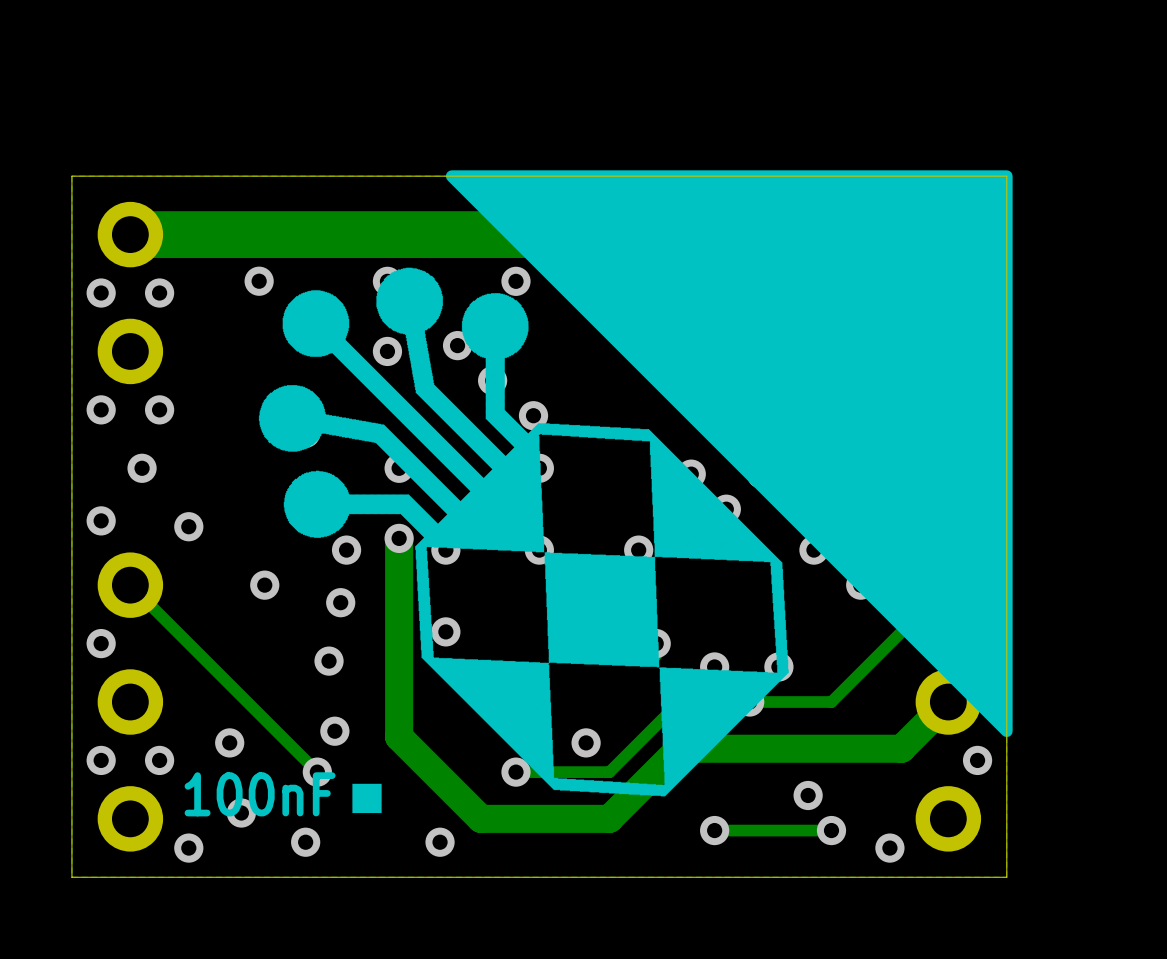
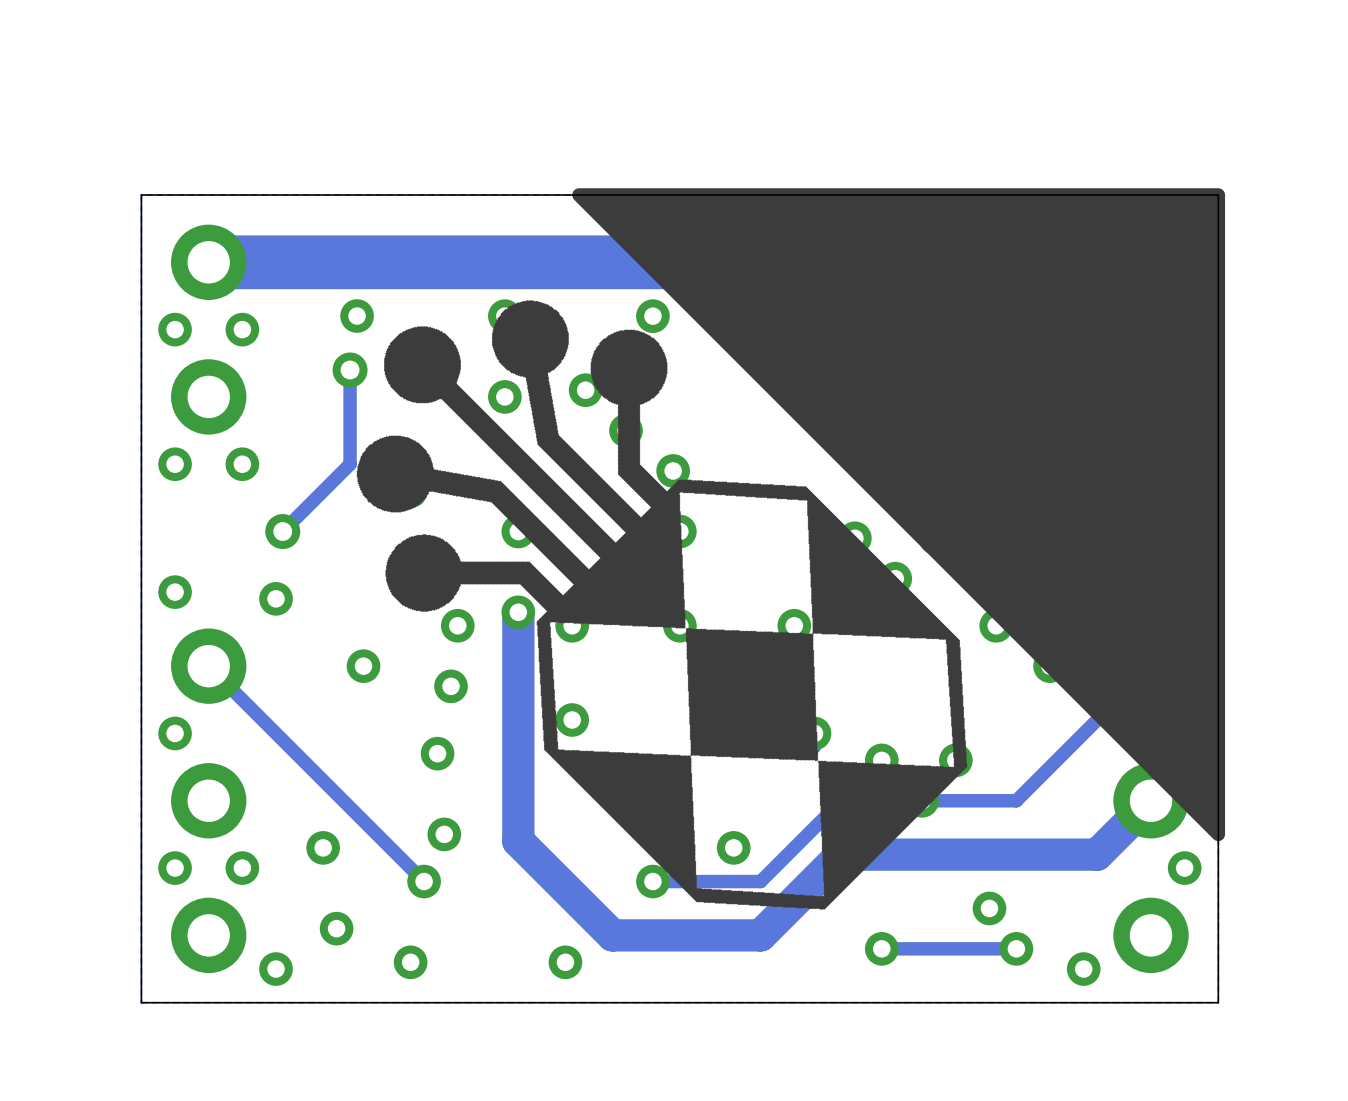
track: none -> (350, 370) (350, 464) (282, 531)
via: none -> (350, 370)
via: (142, 468) -> none
via: none -> (282, 531)
drawing: [352, 783, 382, 814] -> none
text: 100nF (260, 794) -> none

